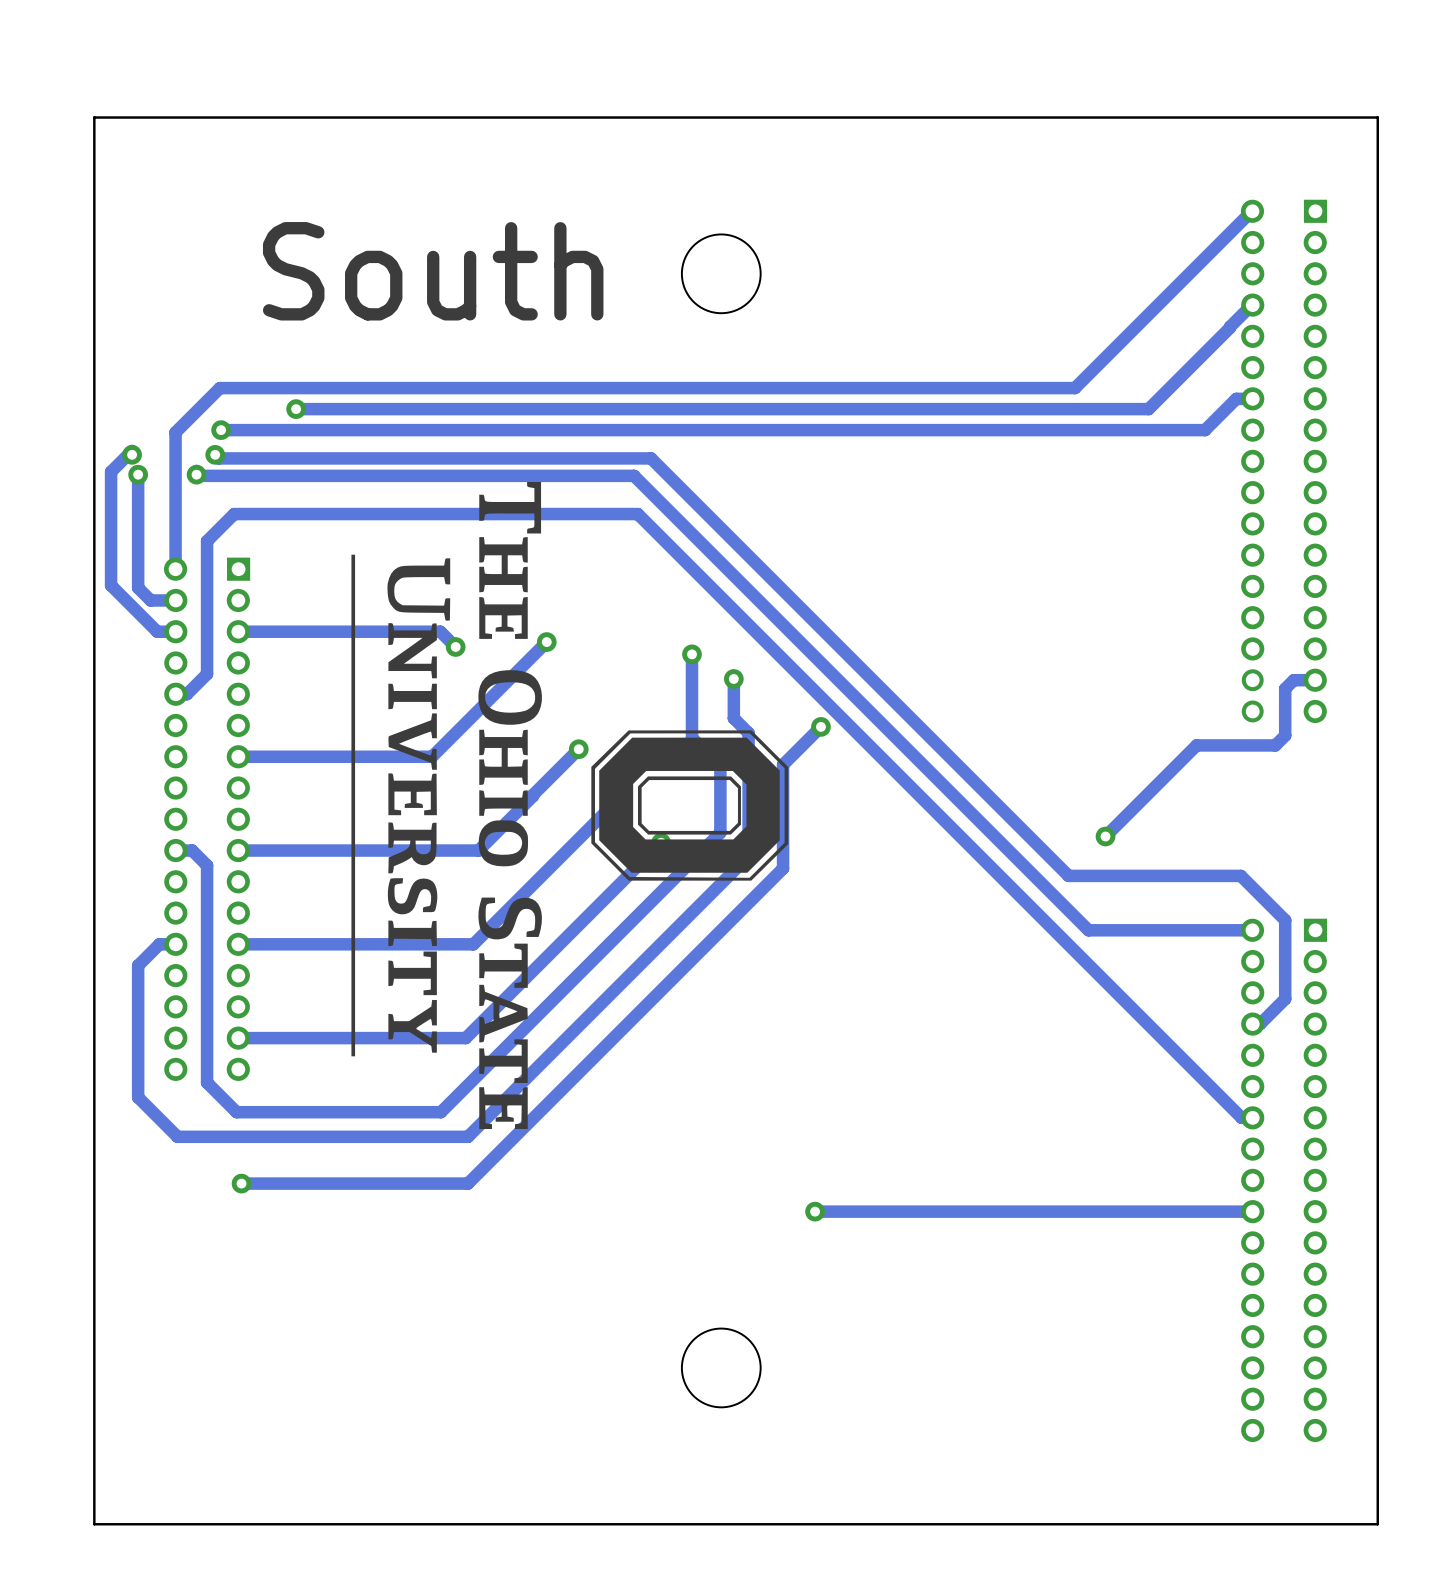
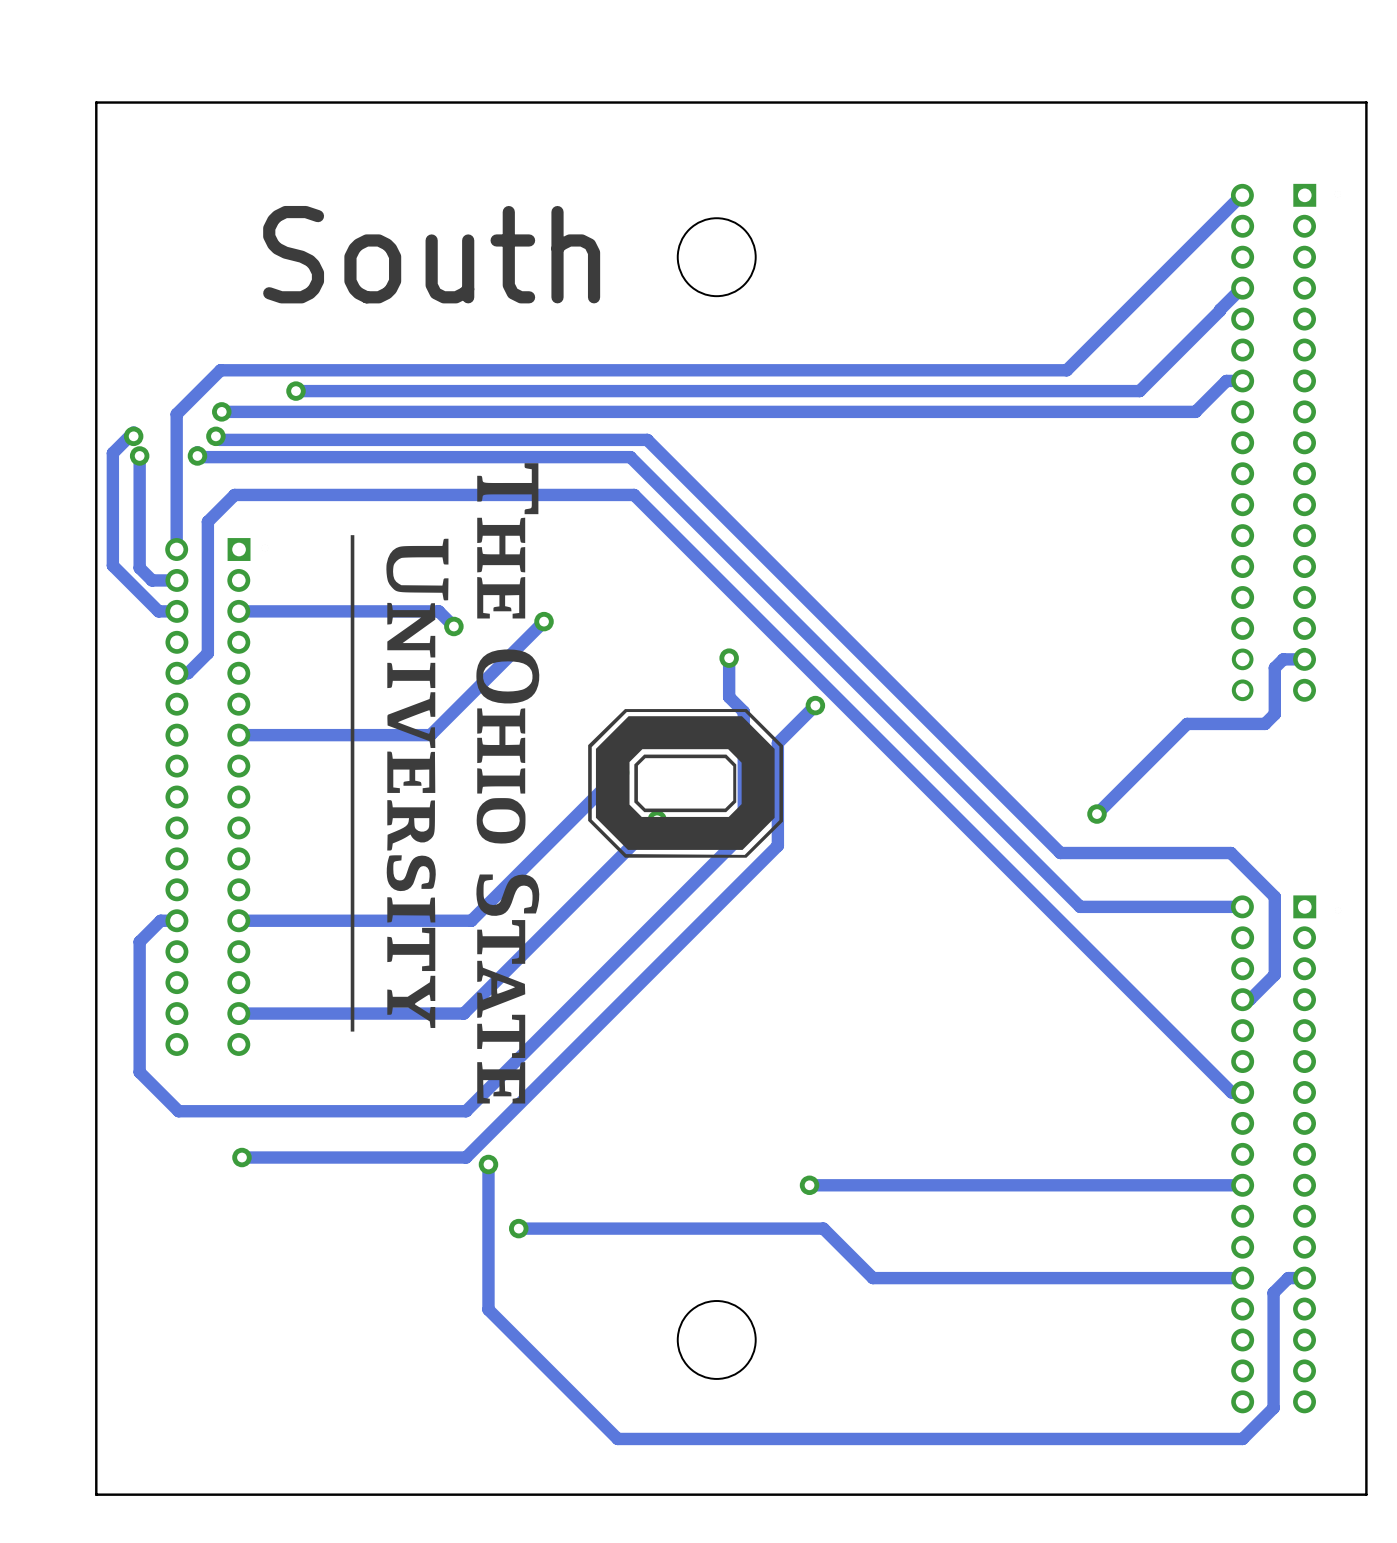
track: (691, 654) (691, 737) (720, 766) (720, 832) (440, 1112) (236, 1112) (207, 1082) (207, 865) (192, 850) (175, 850) -> none
via: (691, 654) -> none
track: (578, 749) (478, 850) (238, 850) -> none
via: (578, 749) -> none
track: none -> (488, 1164) (488, 1309) (617, 1438) (1242, 1438) (1273, 1408) (1273, 1292) (1288, 1278) (1304, 1278)
via: none -> (488, 1164)
track: none -> (518, 1228) (823, 1228) (872, 1278) (1242, 1278)
via: none -> (518, 1228)

